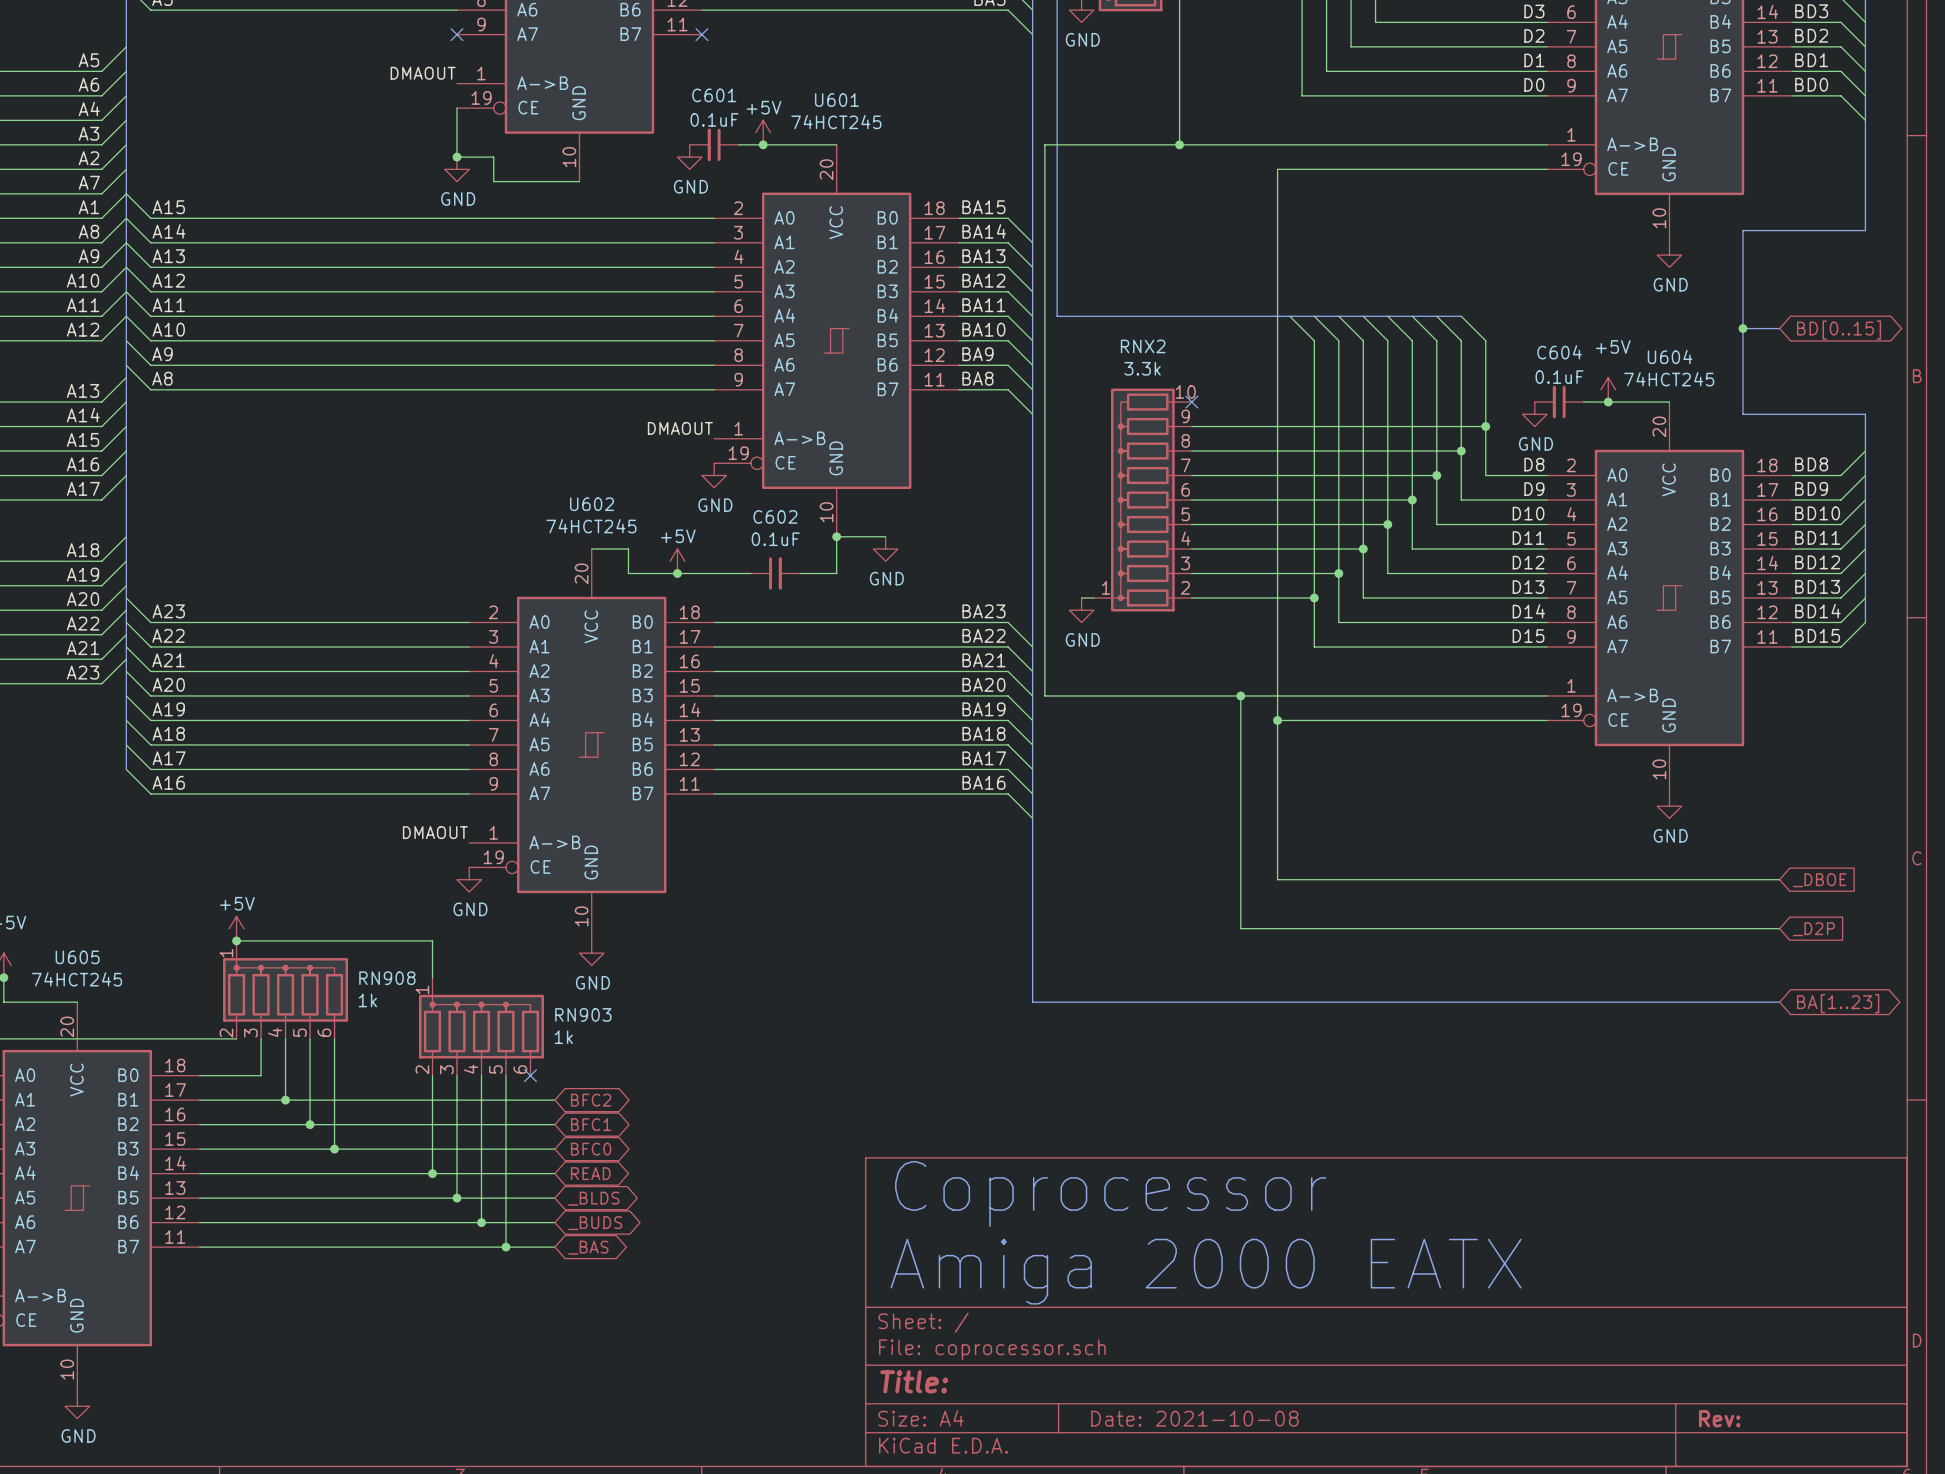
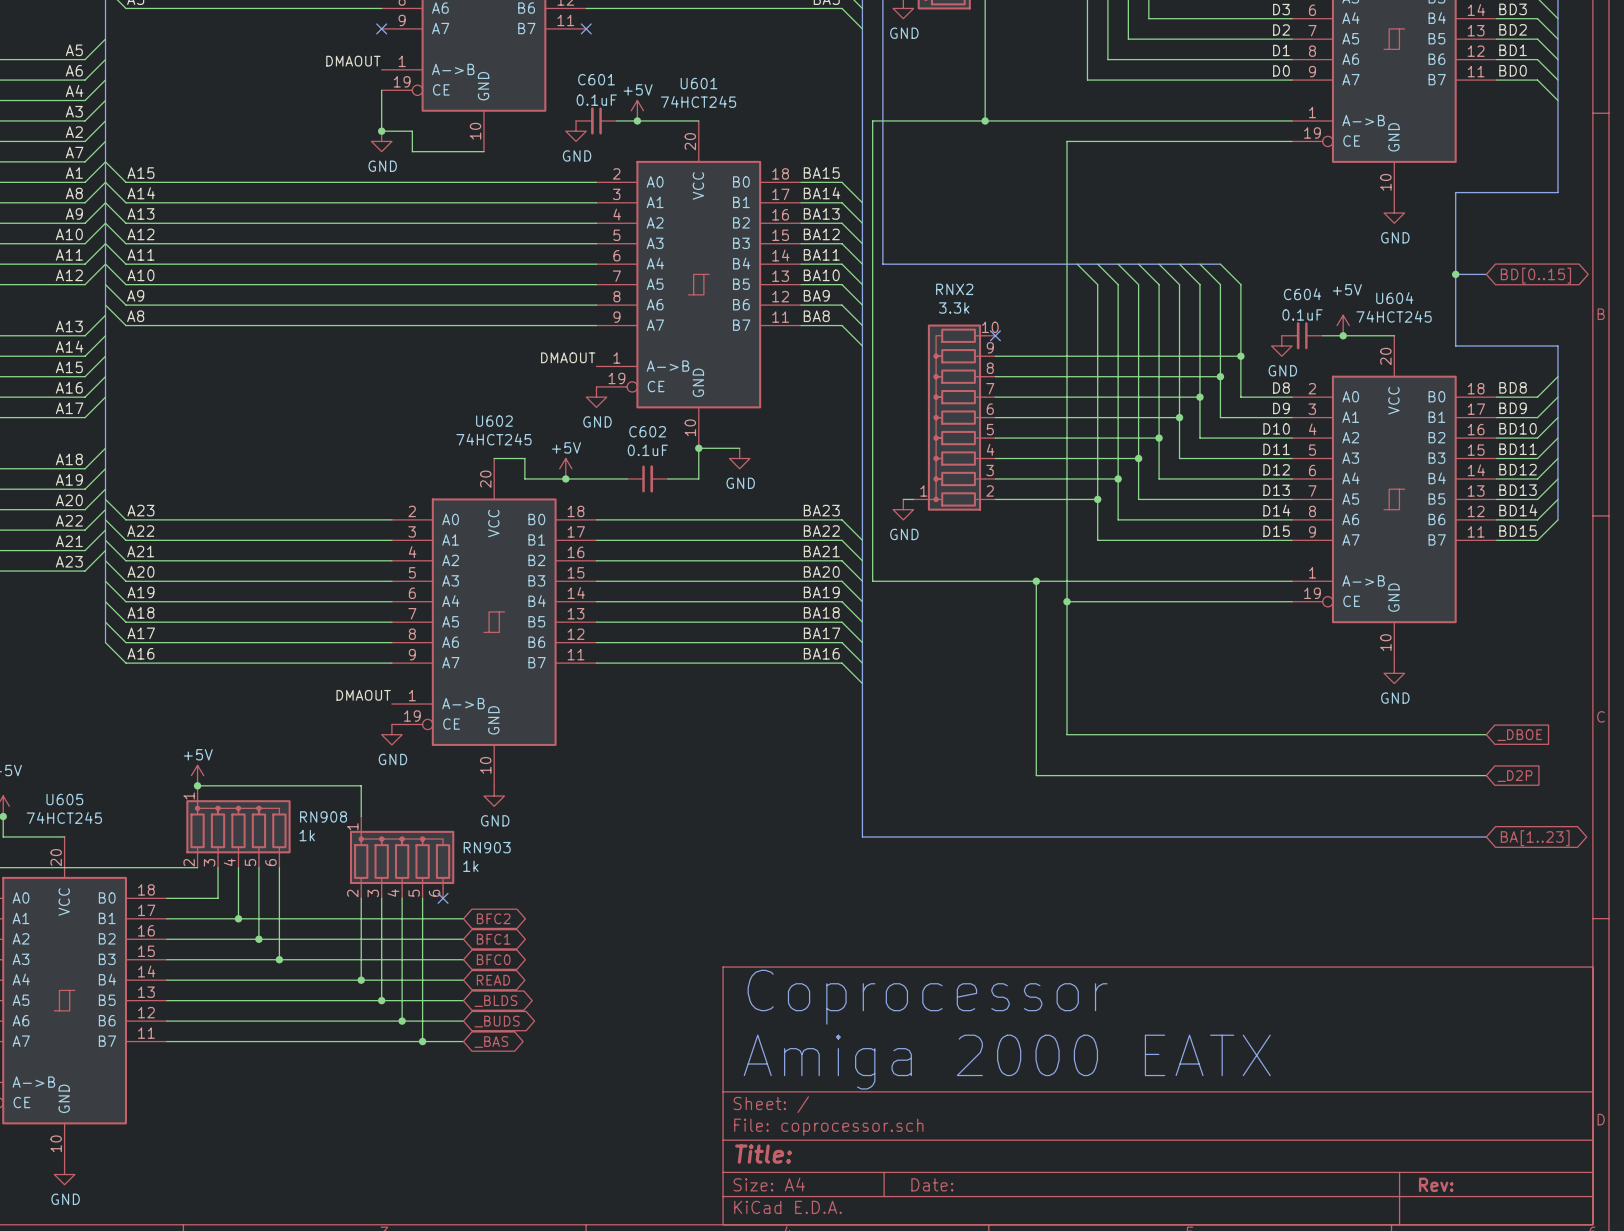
title block: Date: 2021-10-08 (1194, 1418) -> Date: (932, 1184)

